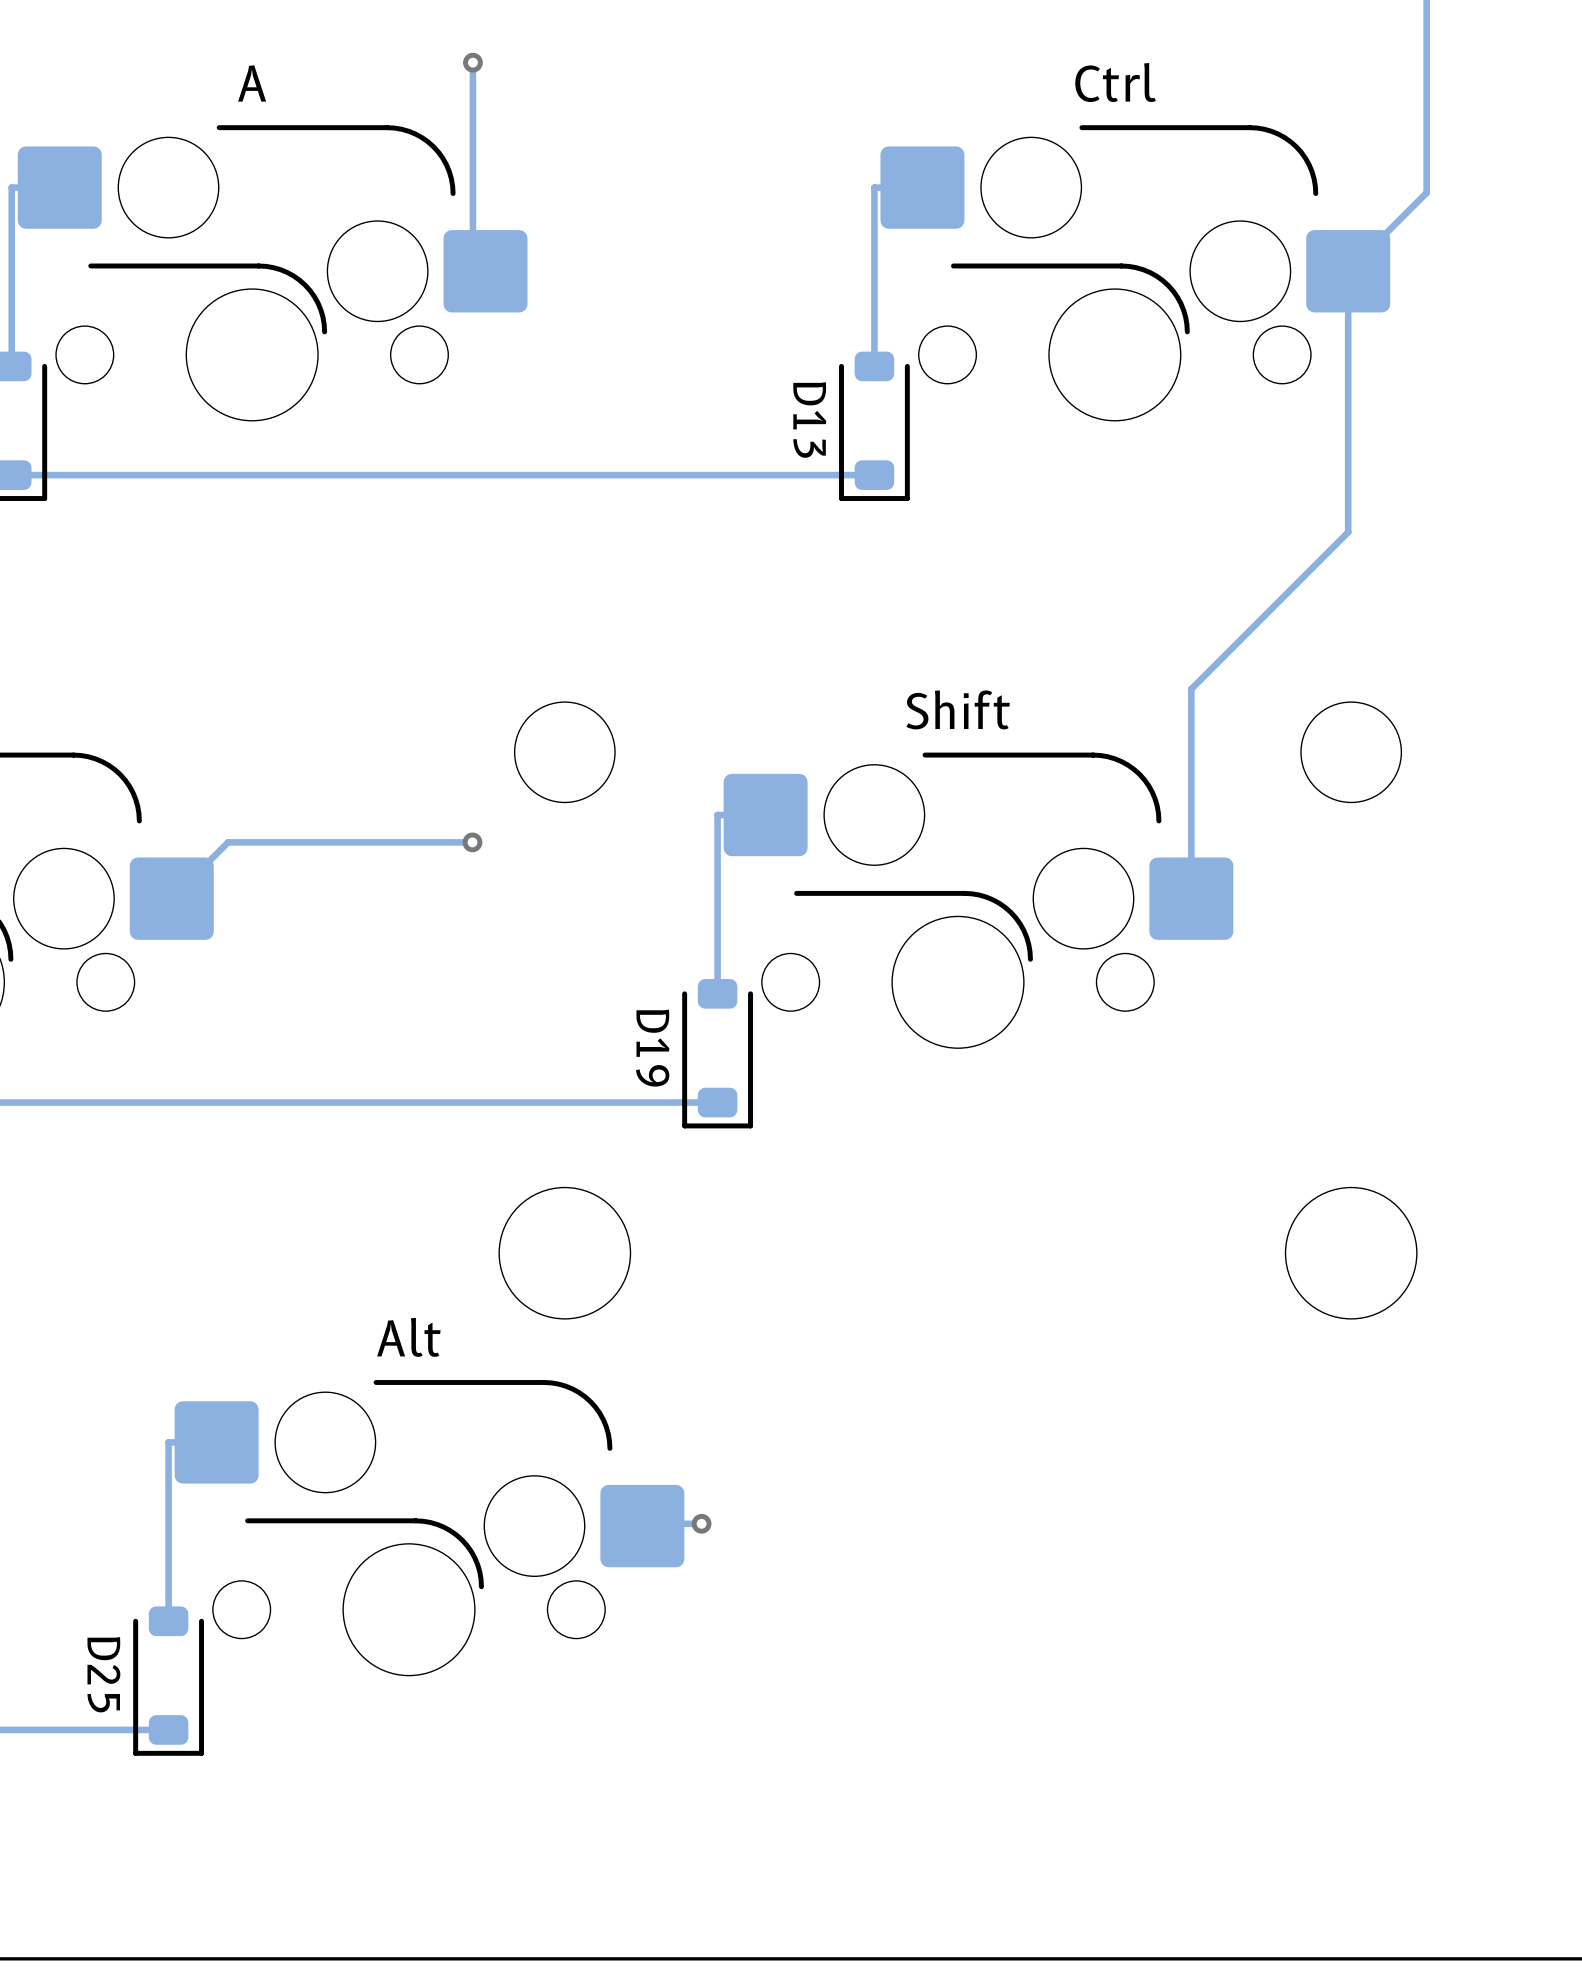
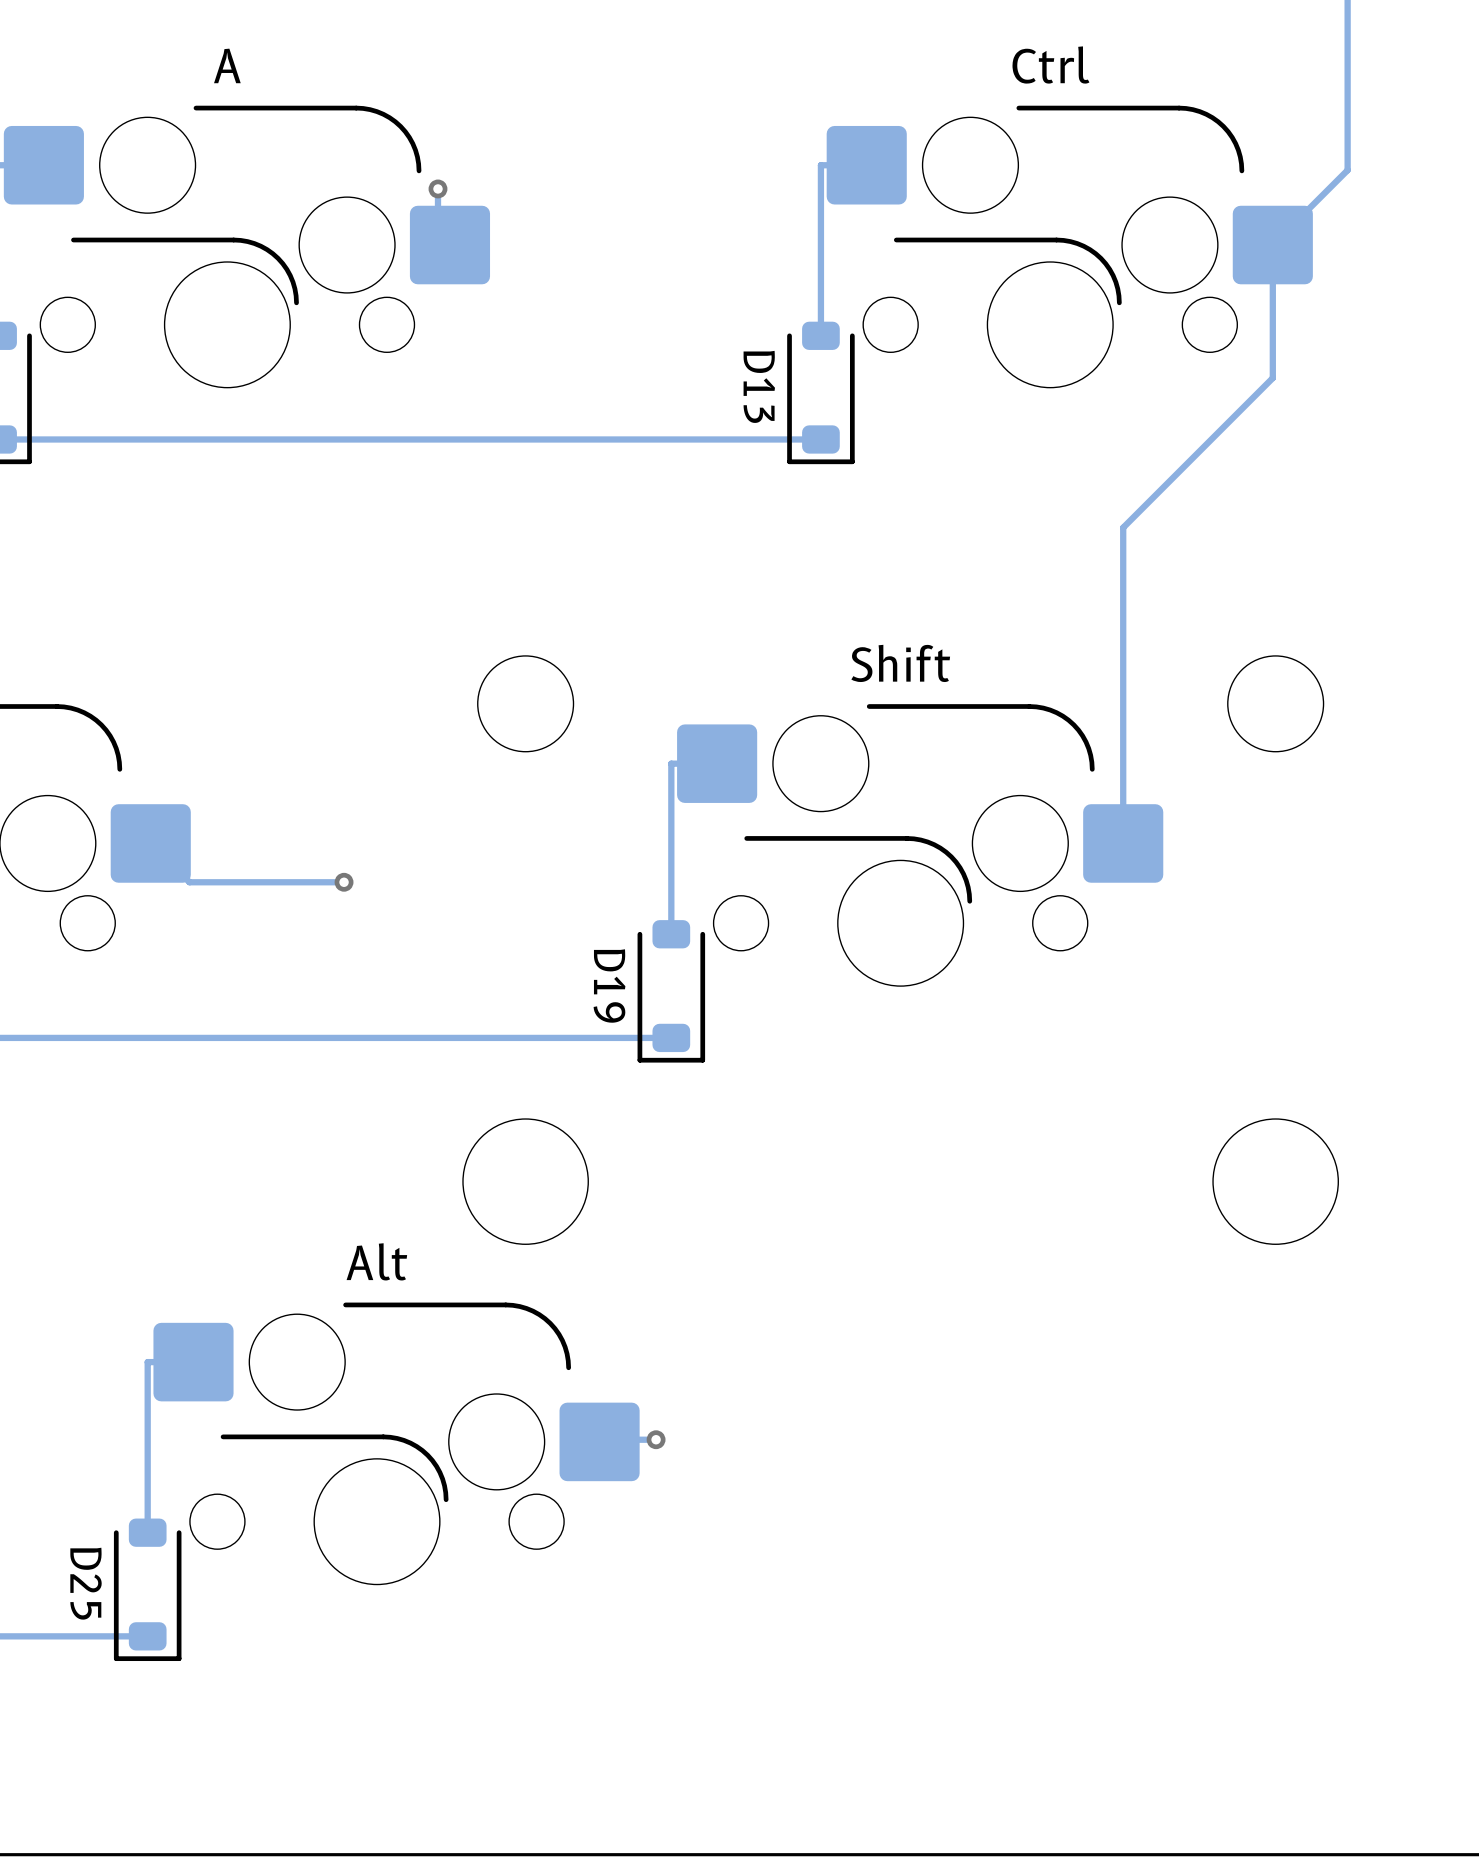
track: (472, 62) (472, 212) -> none
via position: (472, 62) -> (437, 188)
track: (1348, 410) (1348, 532) (1191, 689) -> (1272, 378) (1123, 527) (1123, 643)
track: (472, 842) (228, 842) (171, 898) -> (344, 882) (189, 882) (150, 843)
via position: (472, 842) -> (344, 882)

